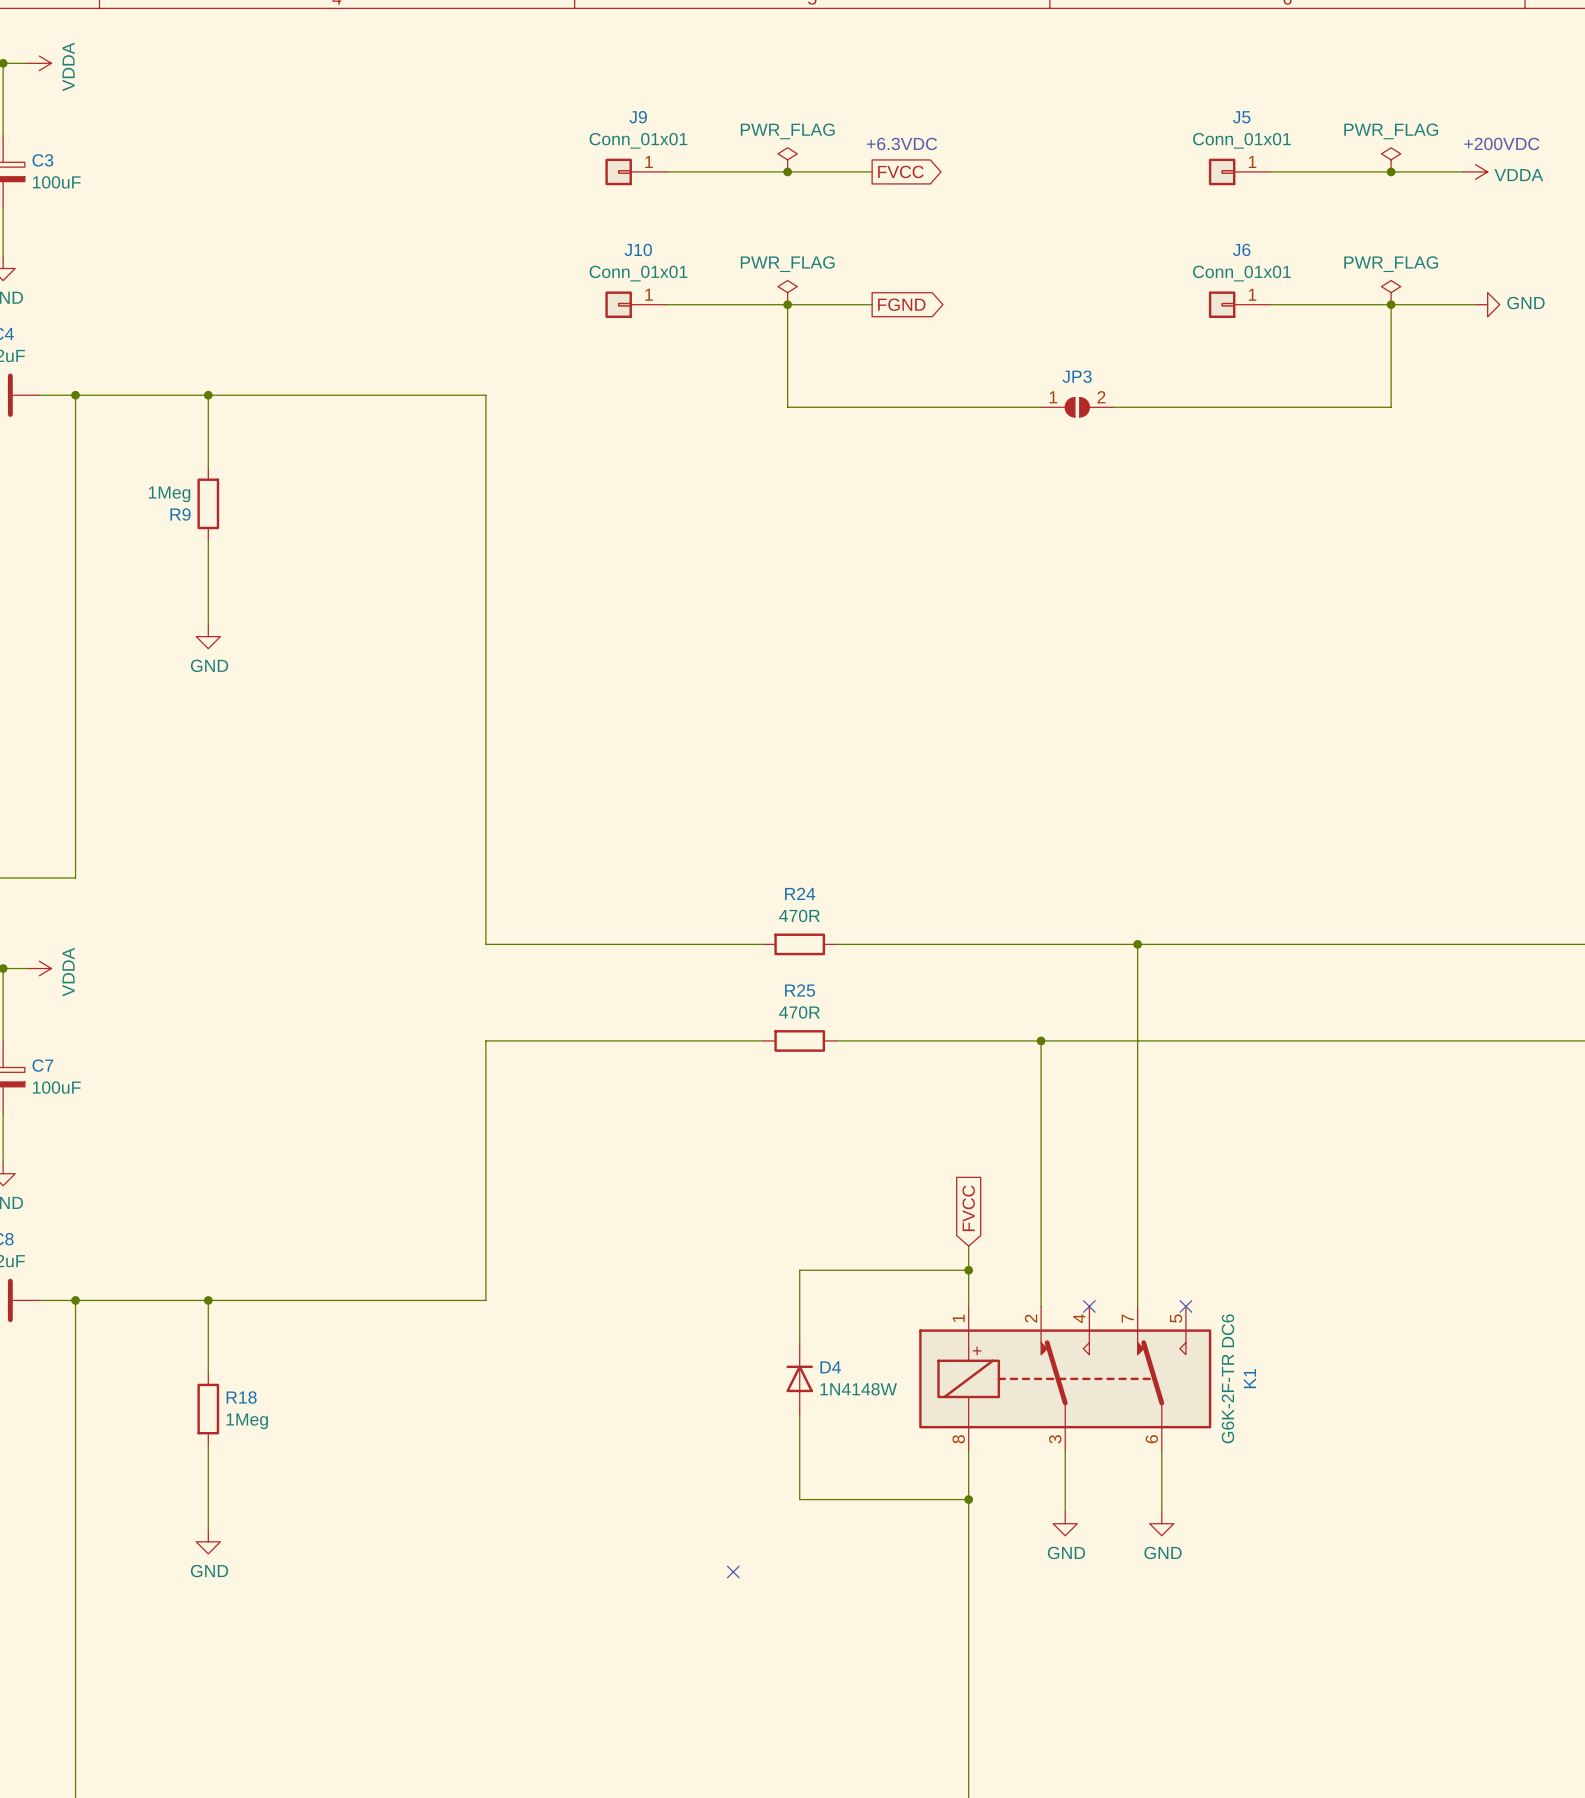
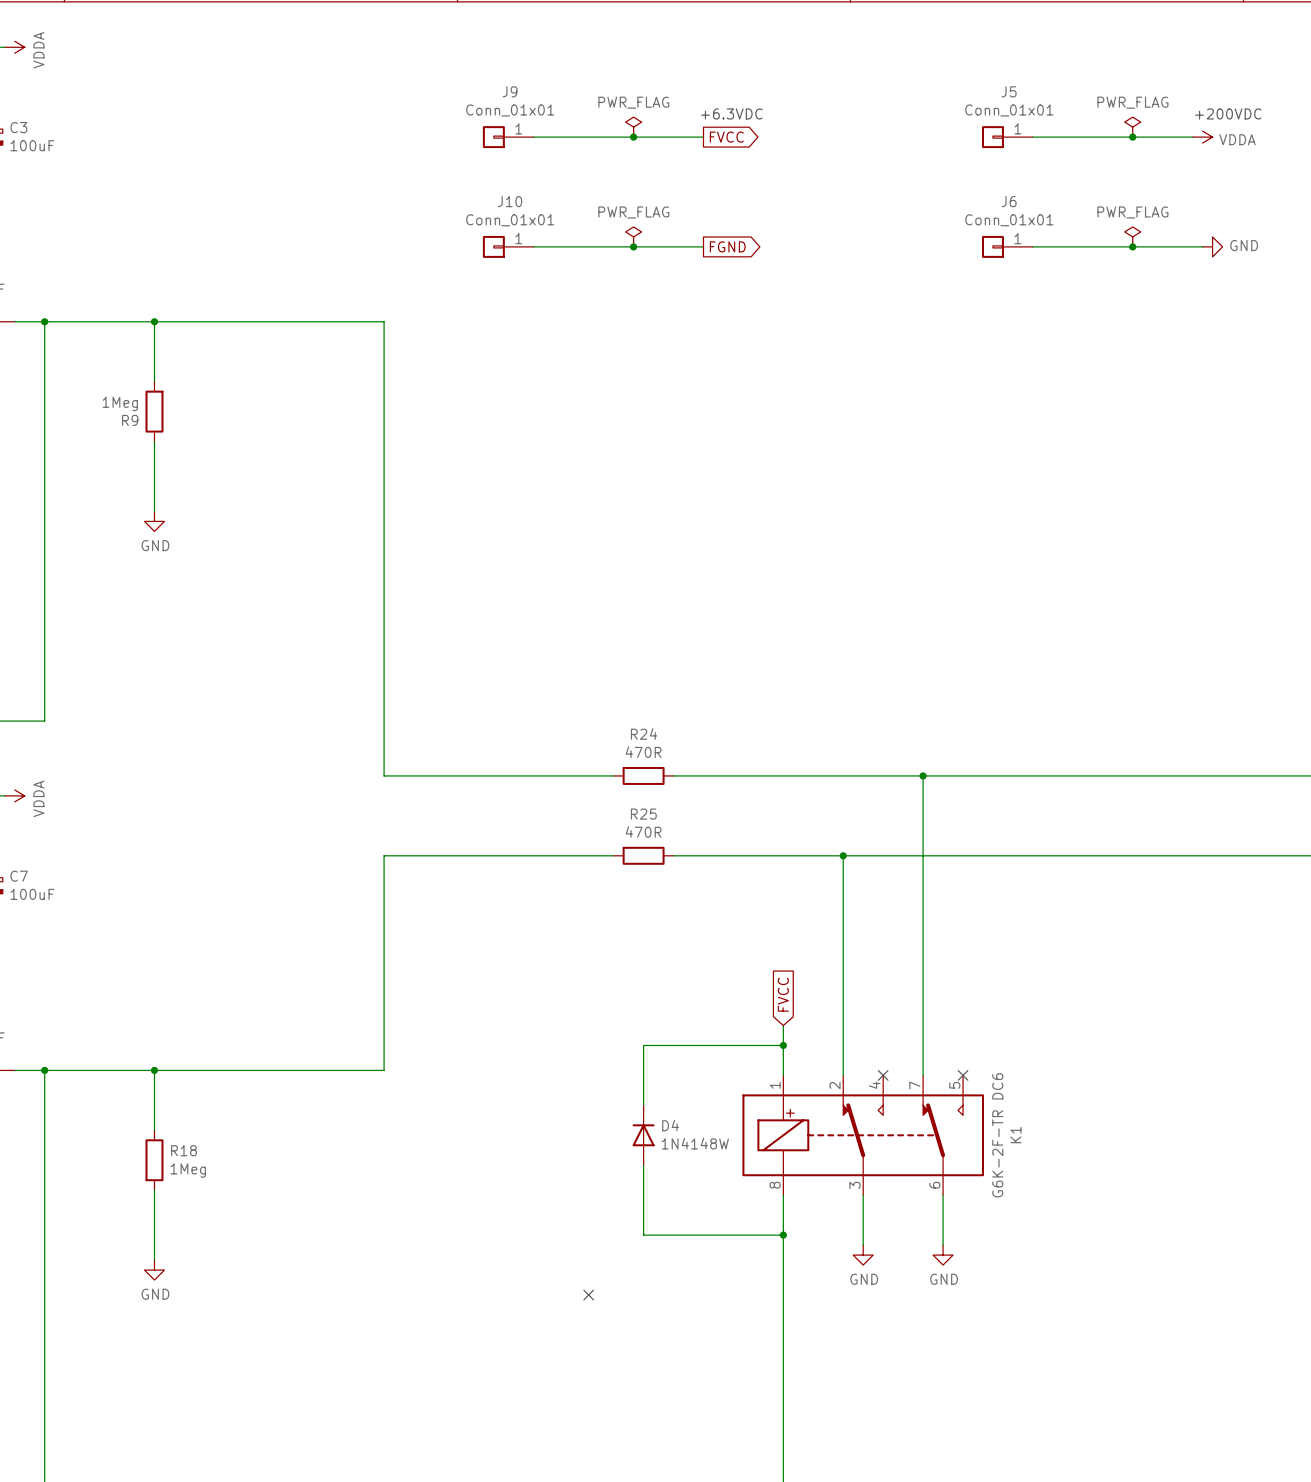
wire: (787, 304) (787, 407) (1041, 407) -> none
wire: (1391, 304) (1391, 407) (1113, 407) -> none
JP3: (1077, 407) -> none

